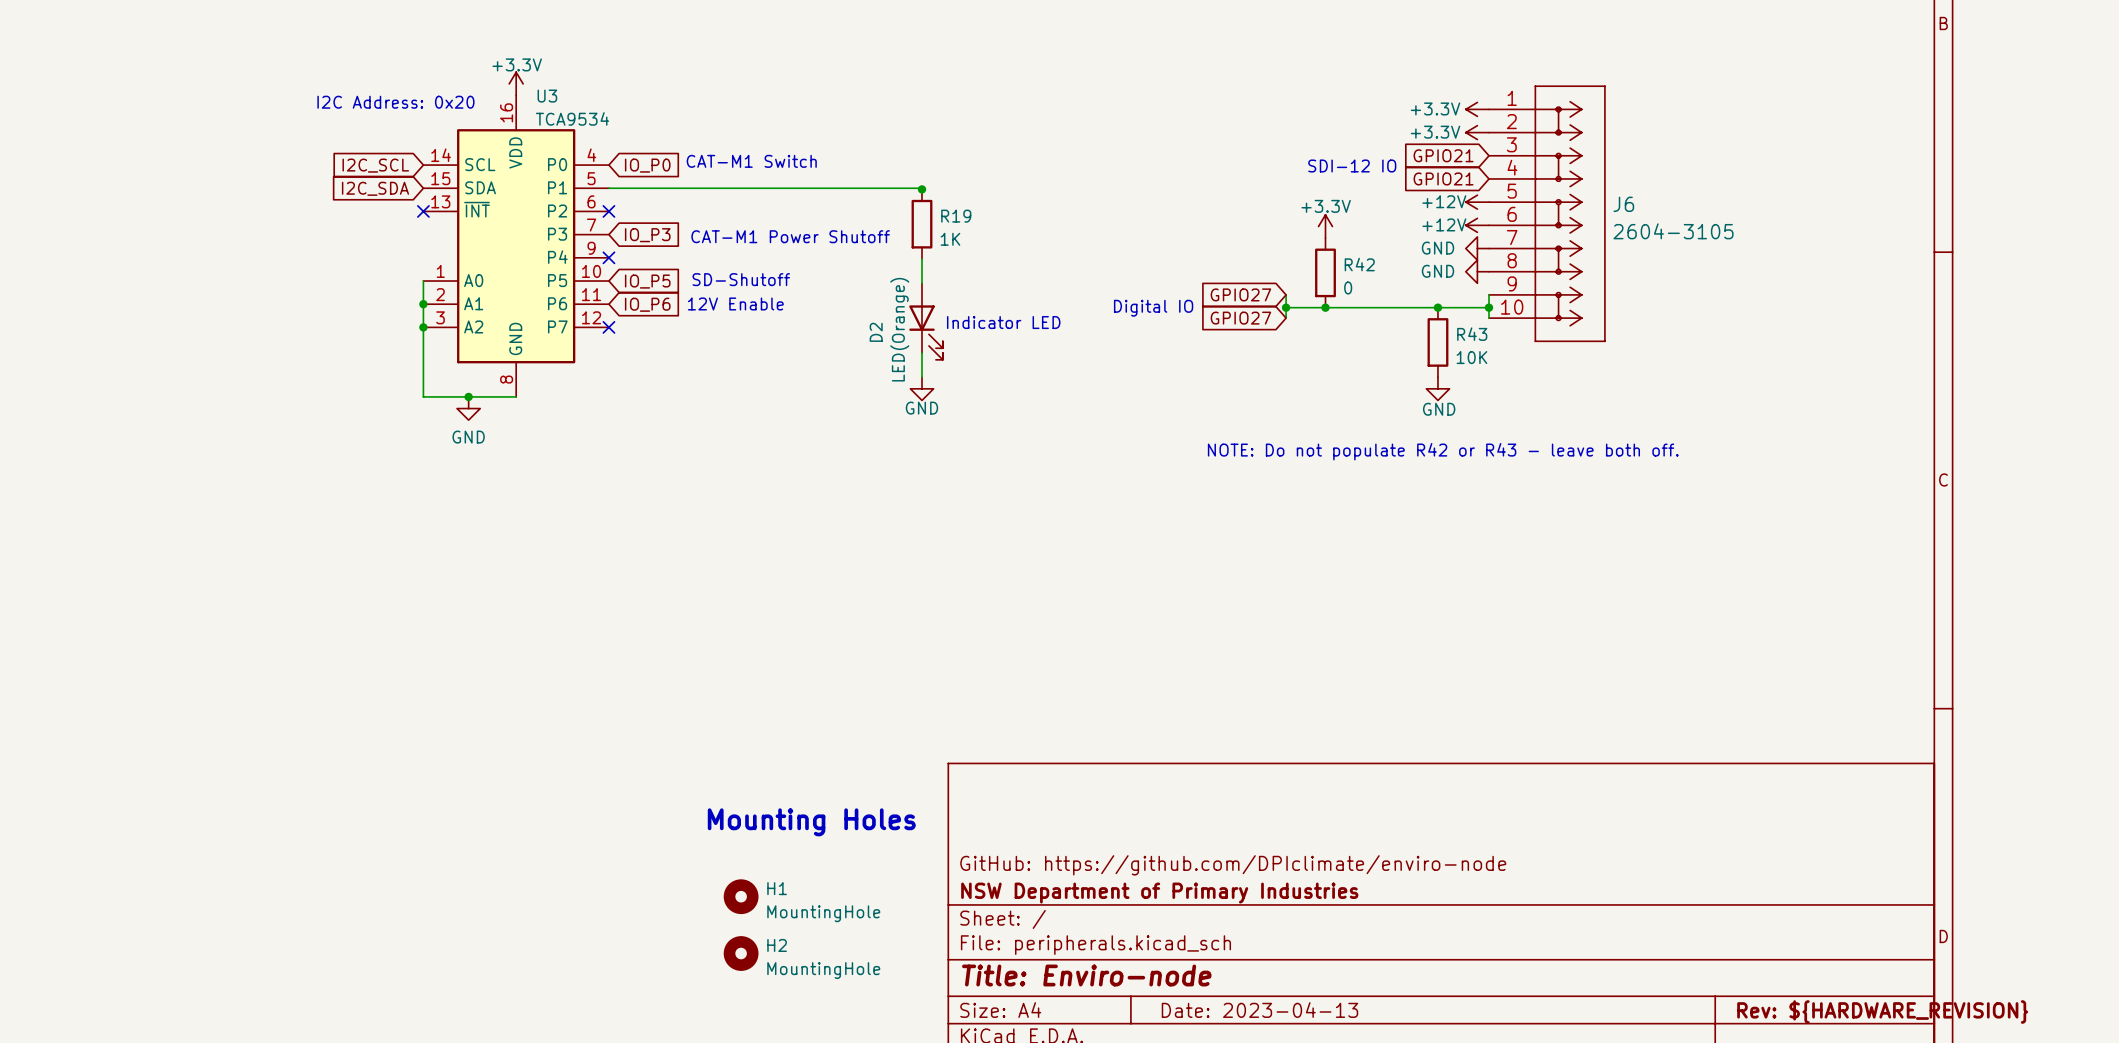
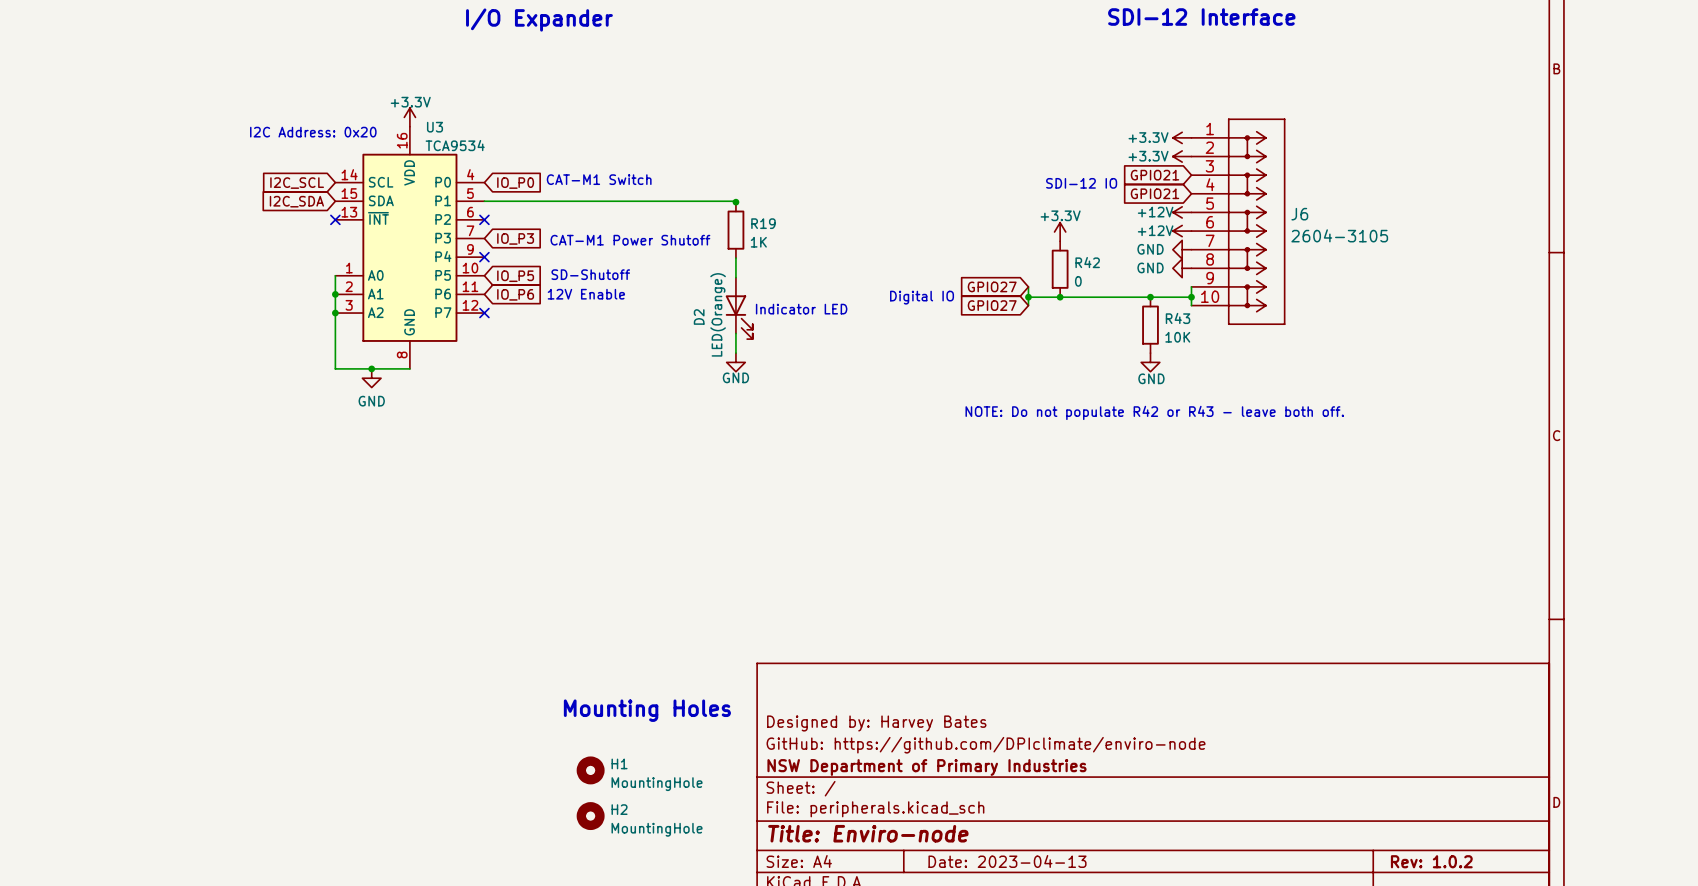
title block: none -> Designed by: Harvey Bates (876, 723)
title block: Rev: ${HARDWARE_REVISION} (1882, 1011) -> Rev: 1.0.2 (1431, 861)

